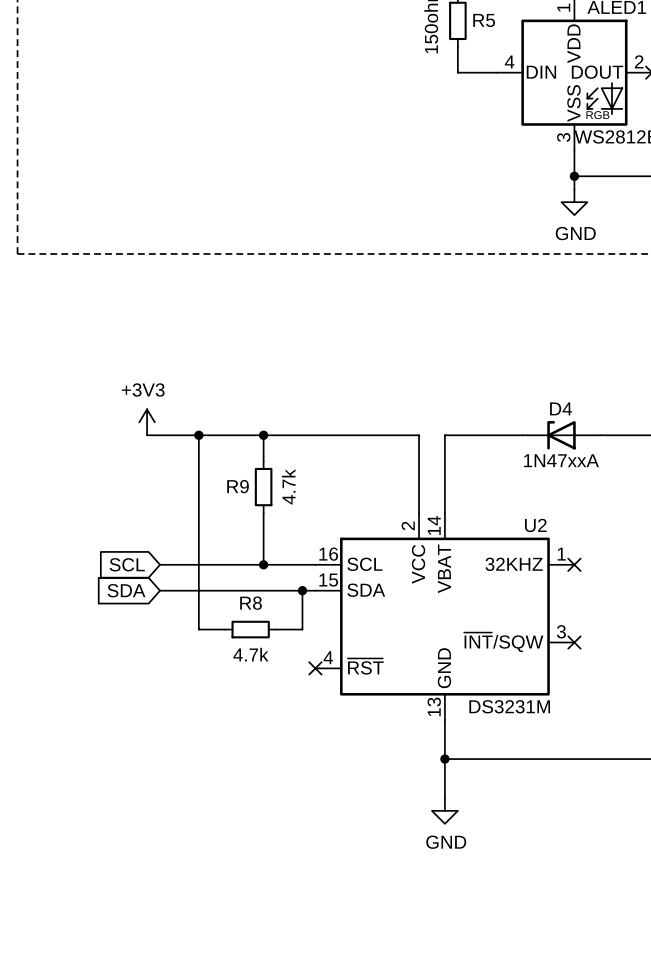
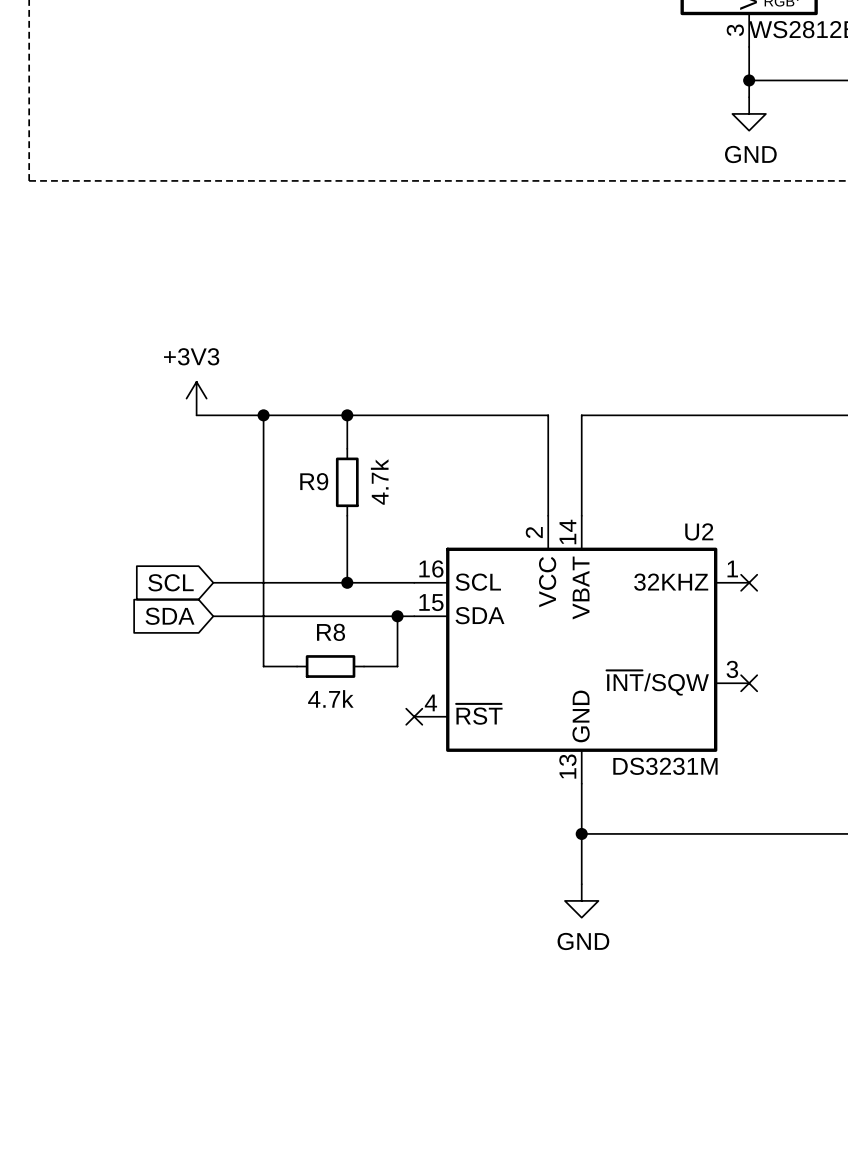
D4: 1N47xxA (561, 435) -> none

